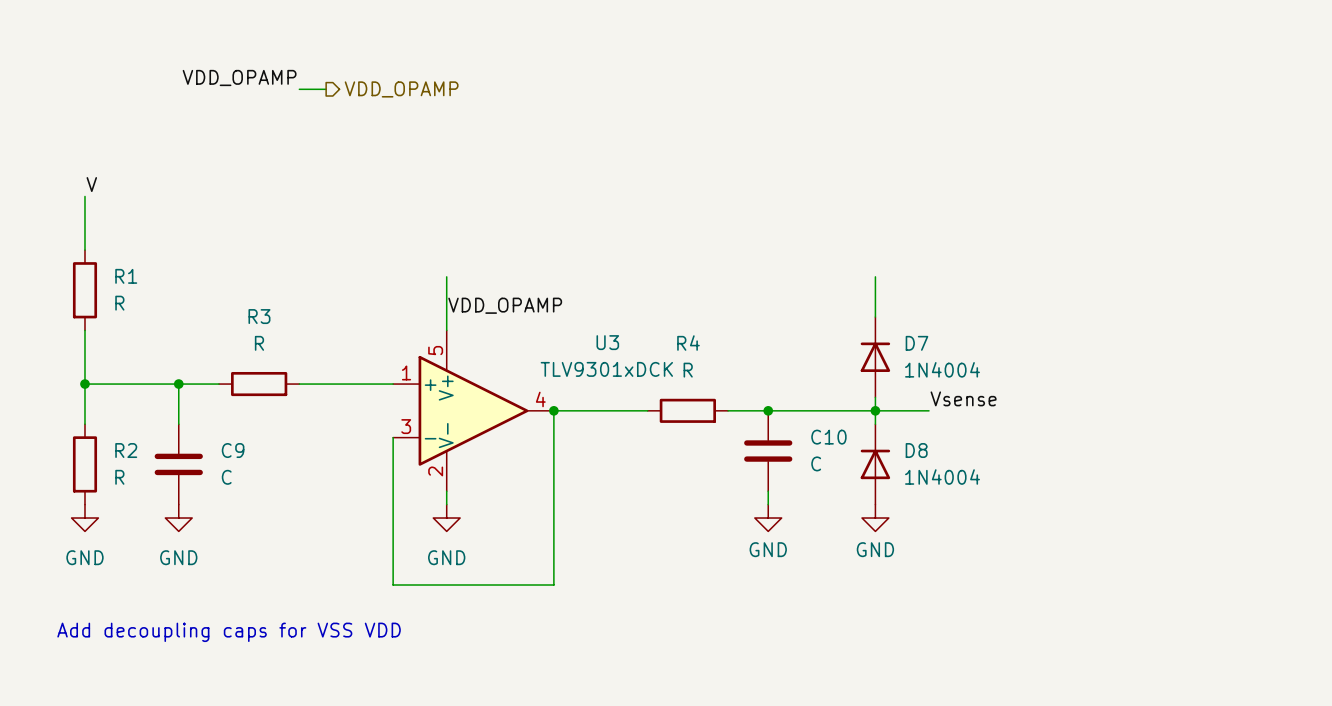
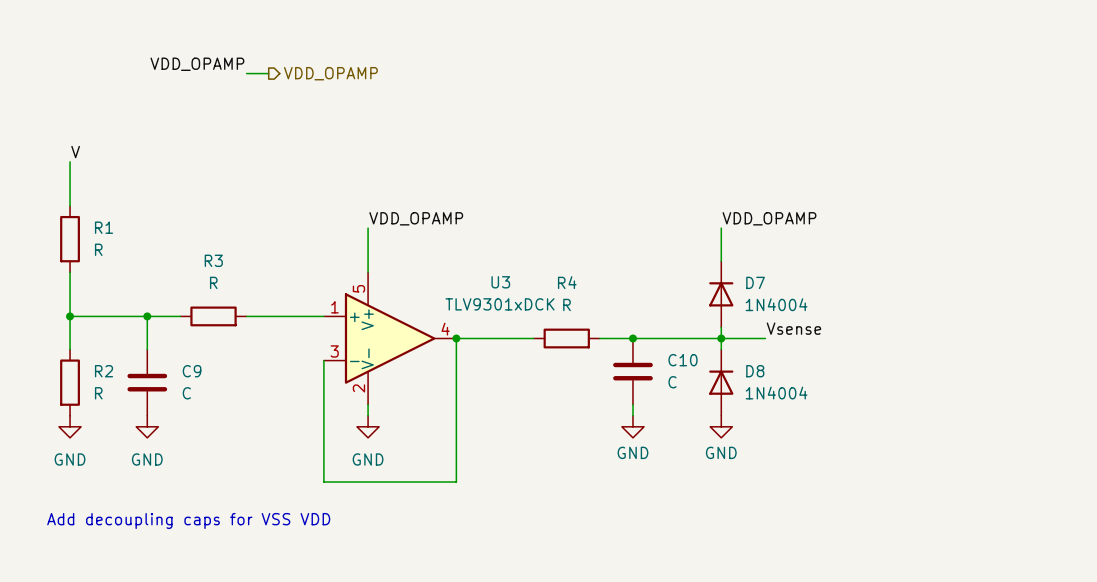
label: none -> VDD_OPAMP (769, 218)
label position: VDD_OPAMP (505, 305) -> VDD_OPAMP (416, 218)

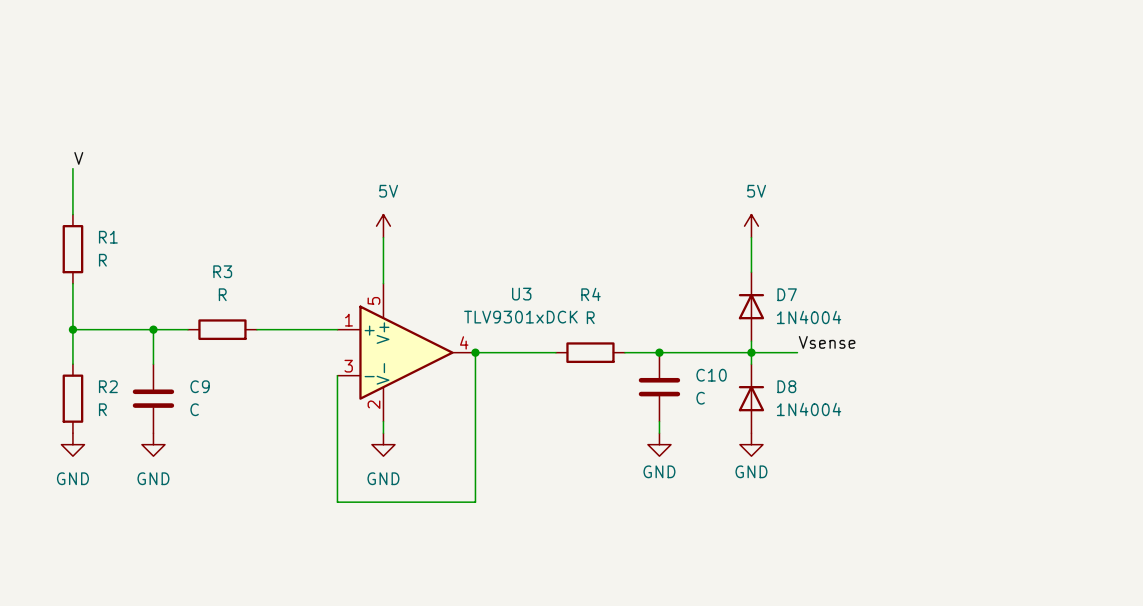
label: VDD_OPAMP (197, 64) -> none
wire: (246, 73) (268, 73) -> none
hierarchical label: VDD_OPAMP (330, 73) -> none
power symbol: none -> 5V (383, 226)
power symbol: none -> 5V (751, 226)
label: VDD_OPAMP (416, 218) -> none
label: VDD_OPAMP (769, 218) -> none
text: Add decoupling caps for VSS VDD (188, 520) -> none

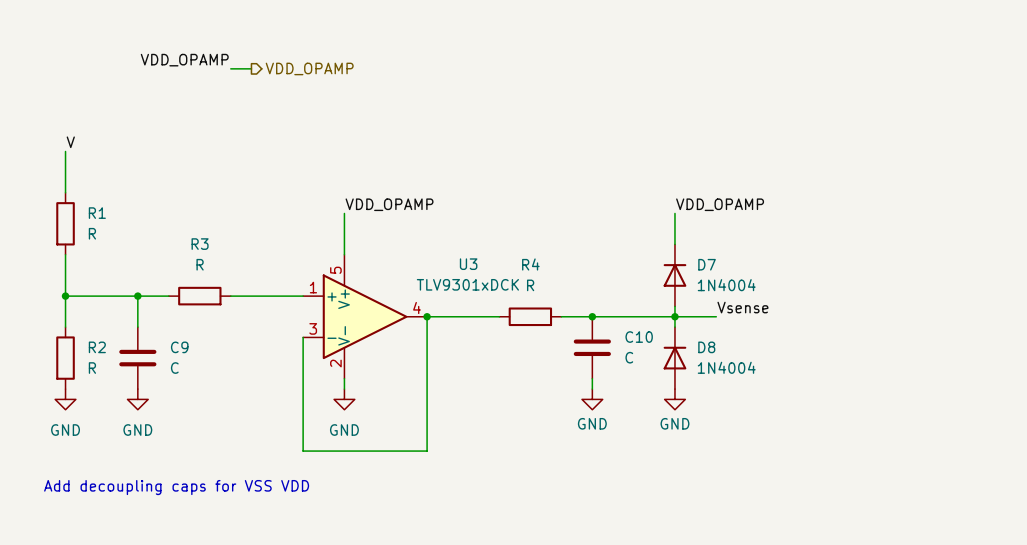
label: none -> VDD_OPAMP (184, 60)
wire: none -> (230, 68) (251, 68)
hierarchical label: none -> VDD_OPAMP (309, 68)
power symbol: 5V (383, 226) -> none
power symbol: 5V (751, 226) -> none
label: none -> VDD_OPAMP (389, 204)
label: none -> VDD_OPAMP (720, 204)
text: none -> Add decoupling caps for VSS VDD (176, 487)

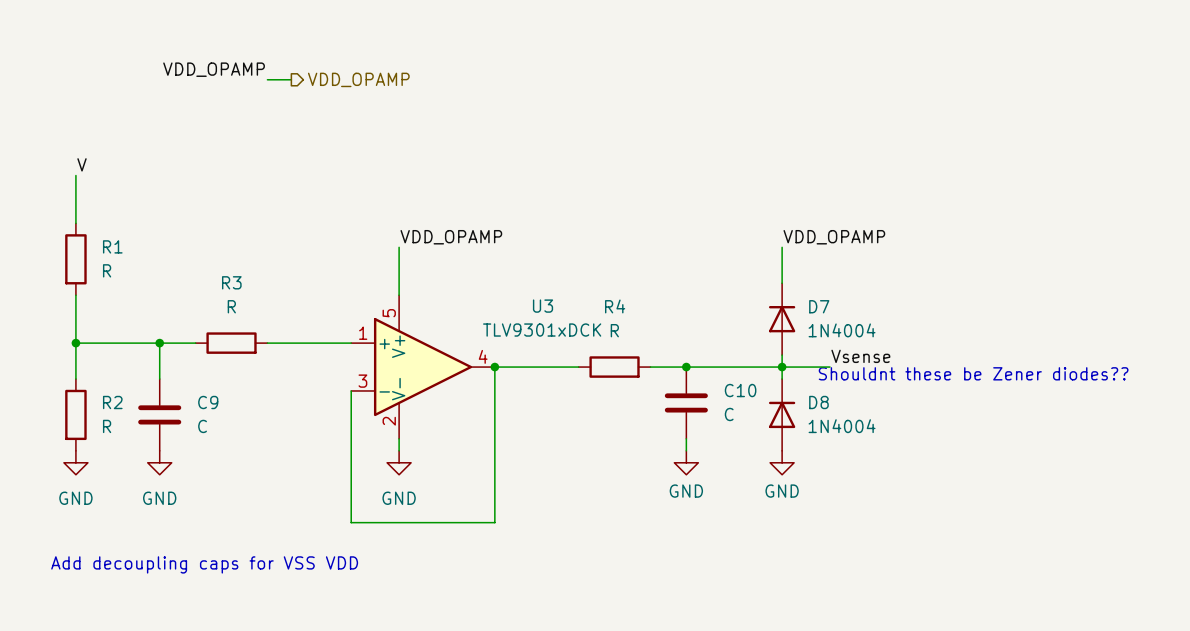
text: none -> Shouldnt these be Zener diodes?? (973, 373)

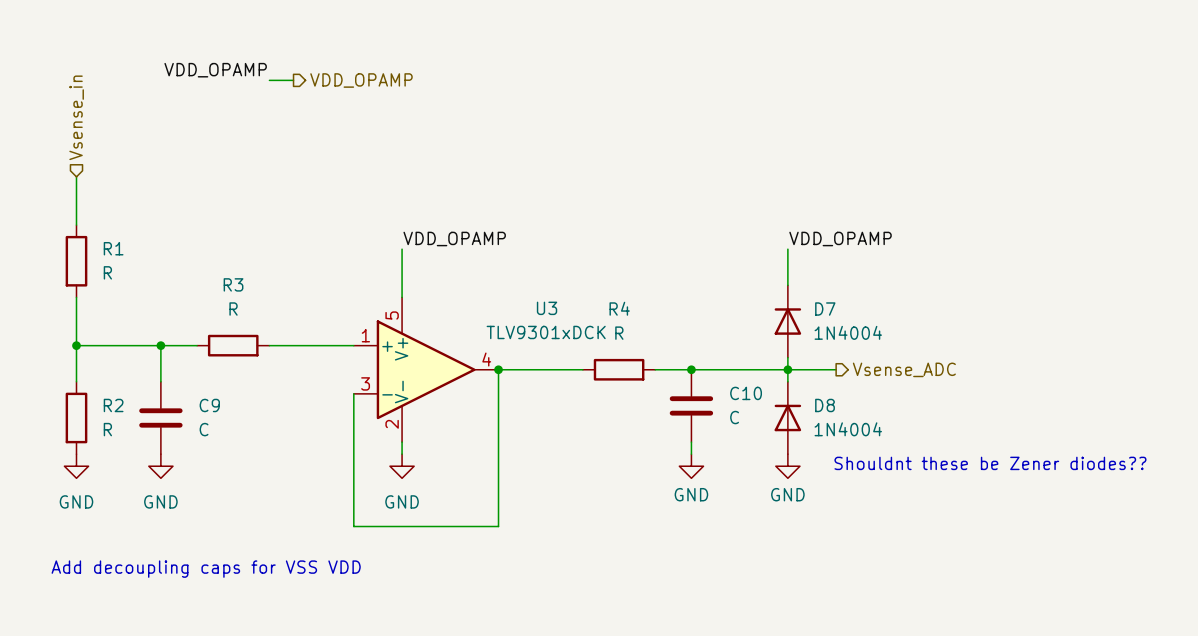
hierarchical label: none -> Vsense_in (76, 117)
label: V (82, 164) -> none
label: Vsense (860, 356) -> none
hierarchical label: none -> Vsense_ADC (904, 369)
text position: Shouldnt these be Zener diodes?? (973, 373) -> Shouldnt these be Zener diodes?? (990, 463)

